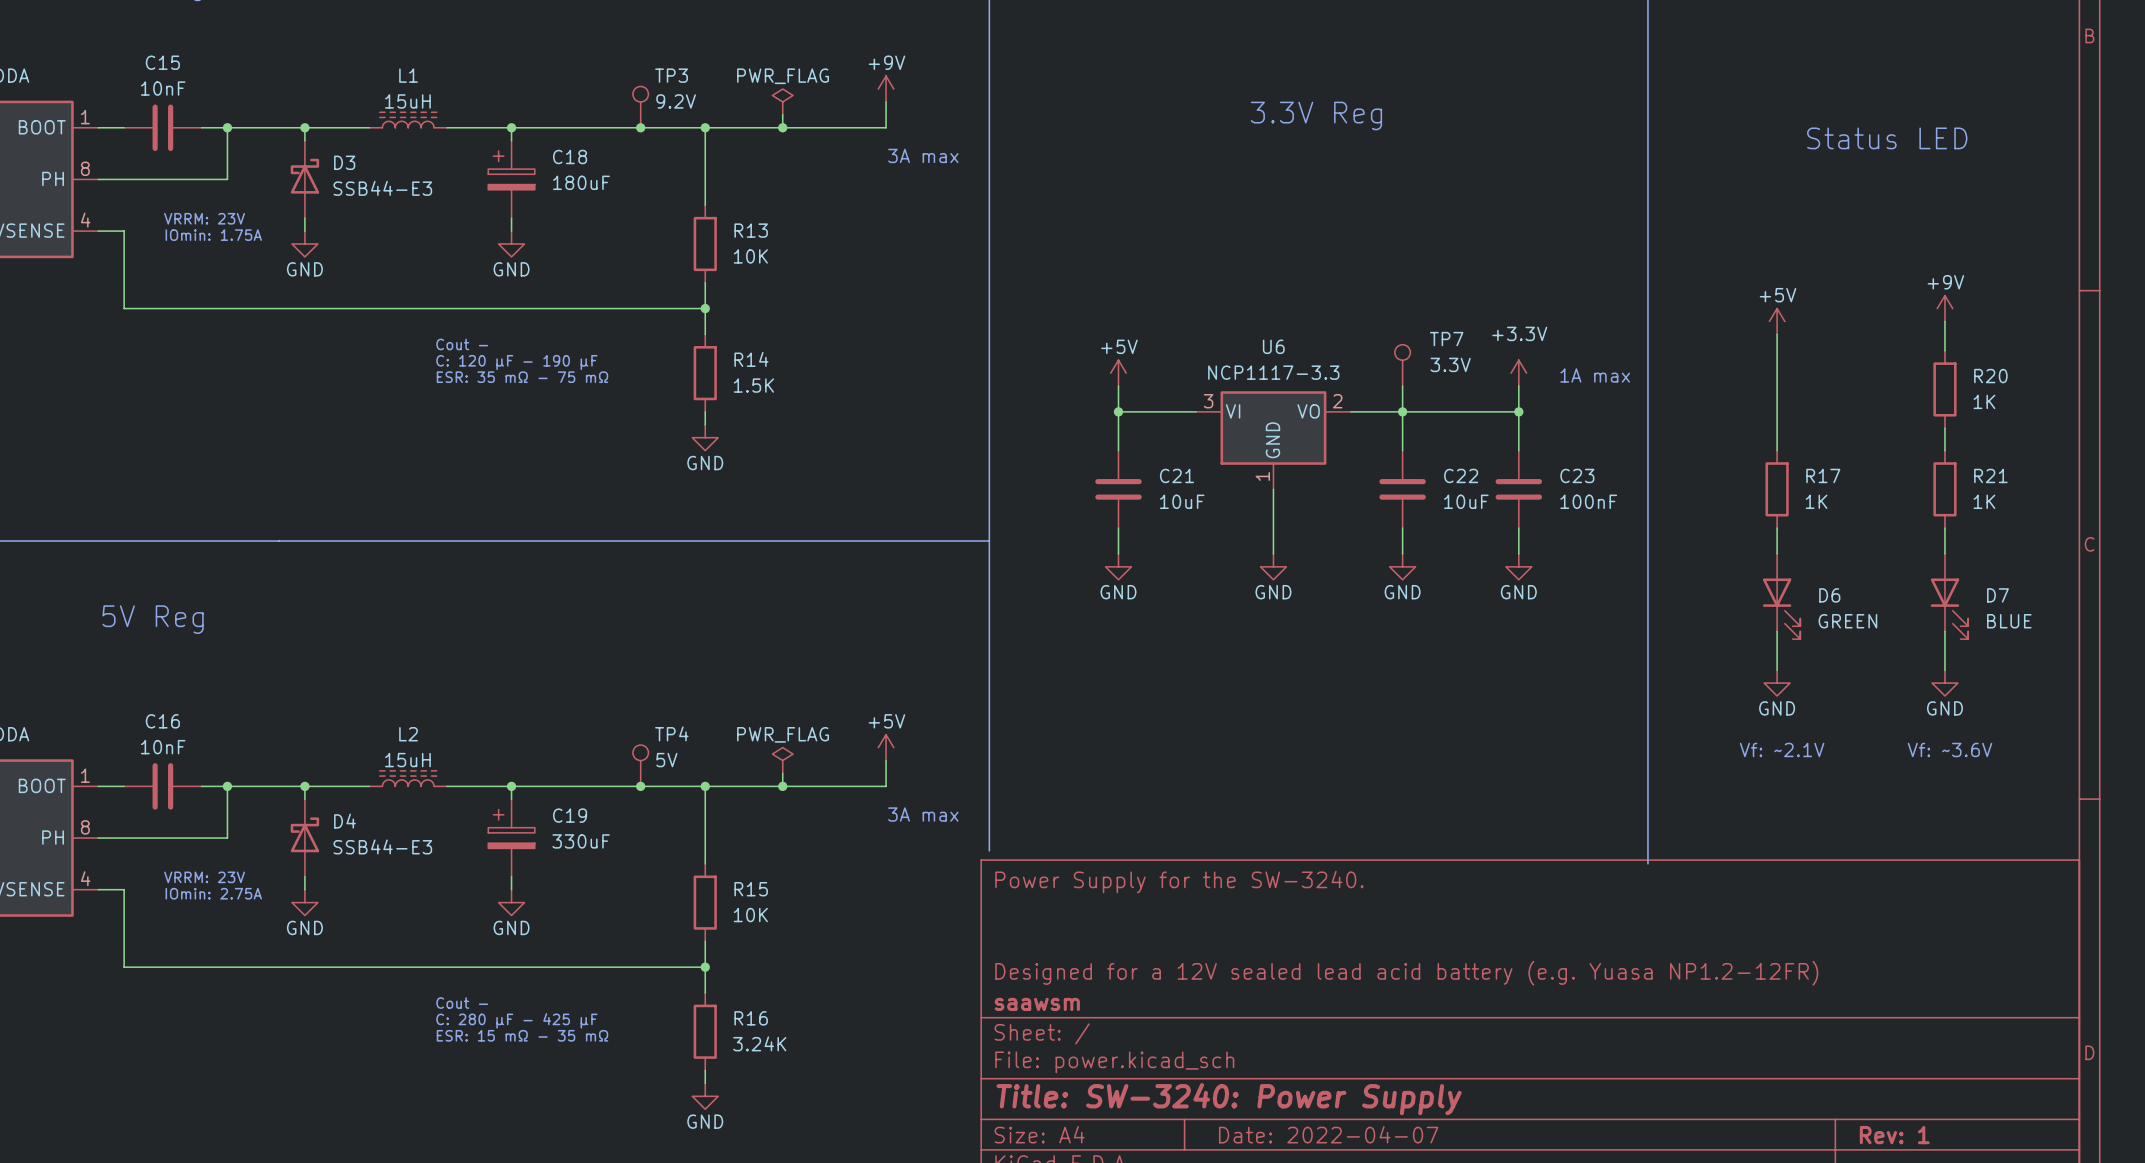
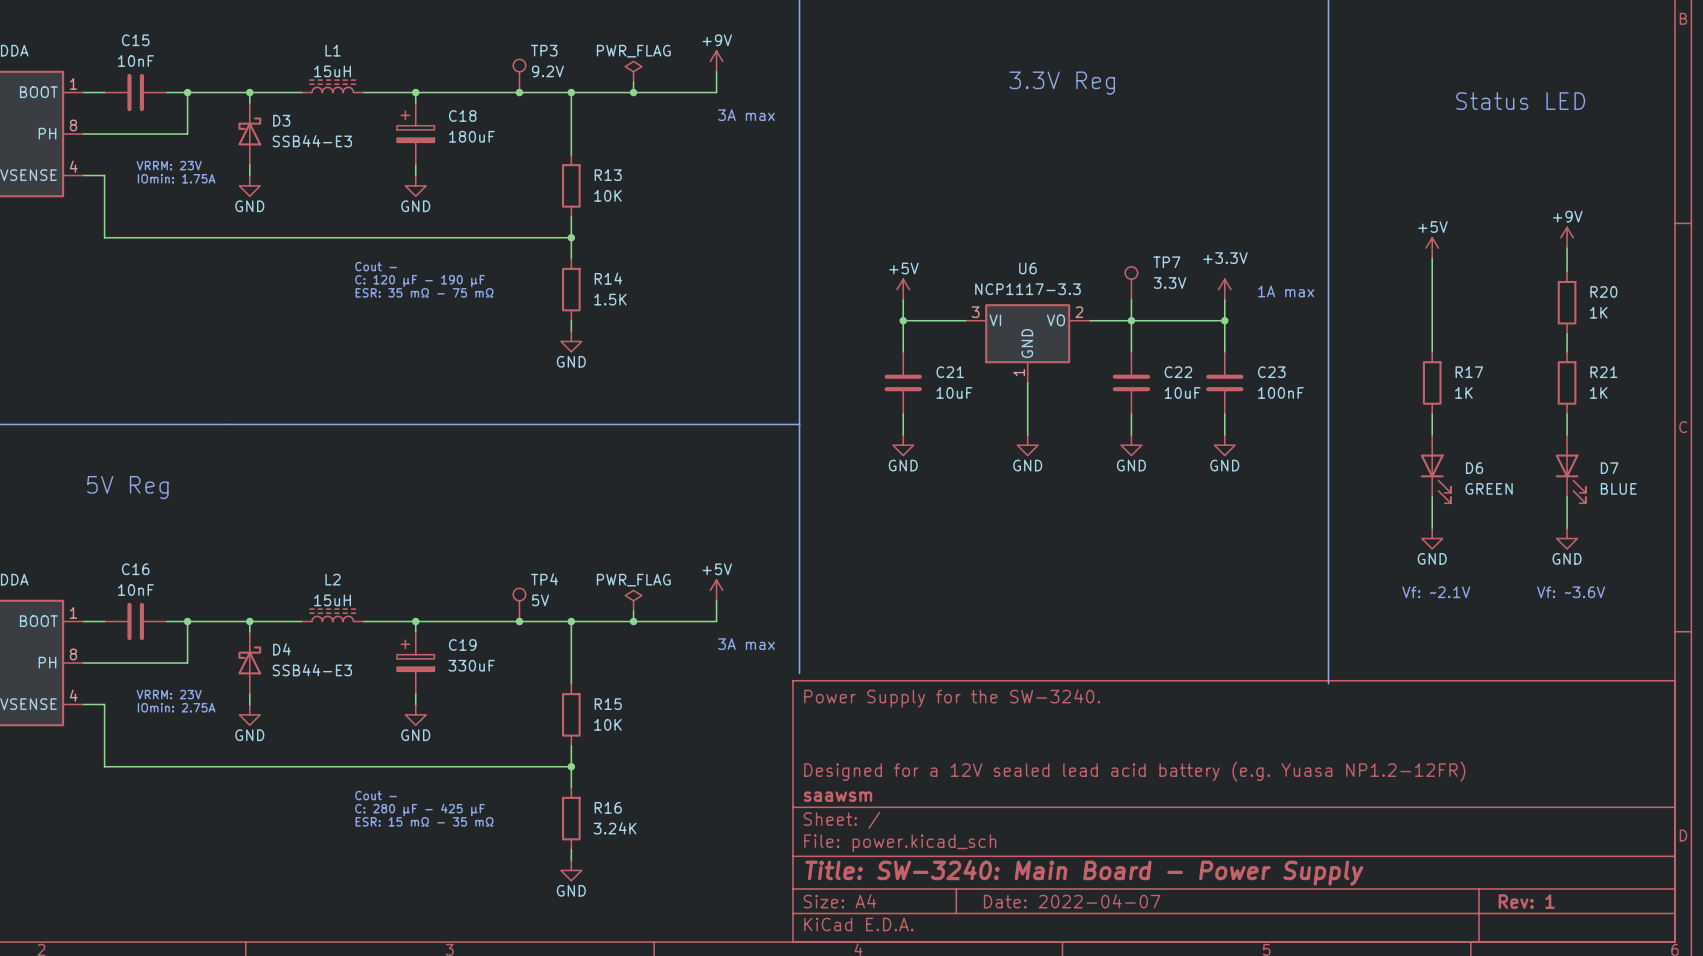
title block: Title: SW-3240: Power Supply (1229, 1099) -> Title: SW-3240: Main Board - Power Supply (1084, 872)

